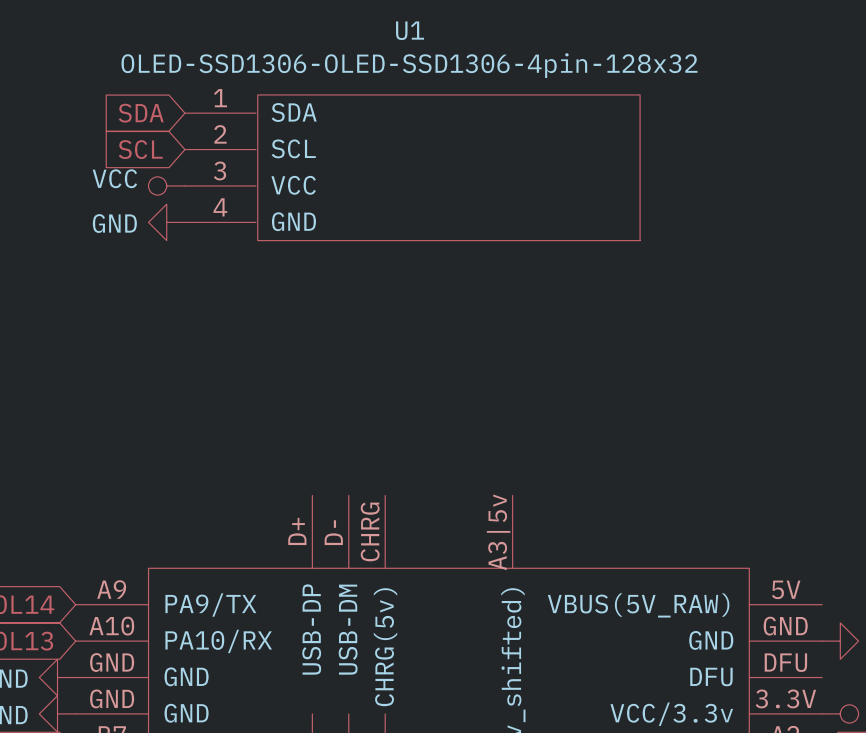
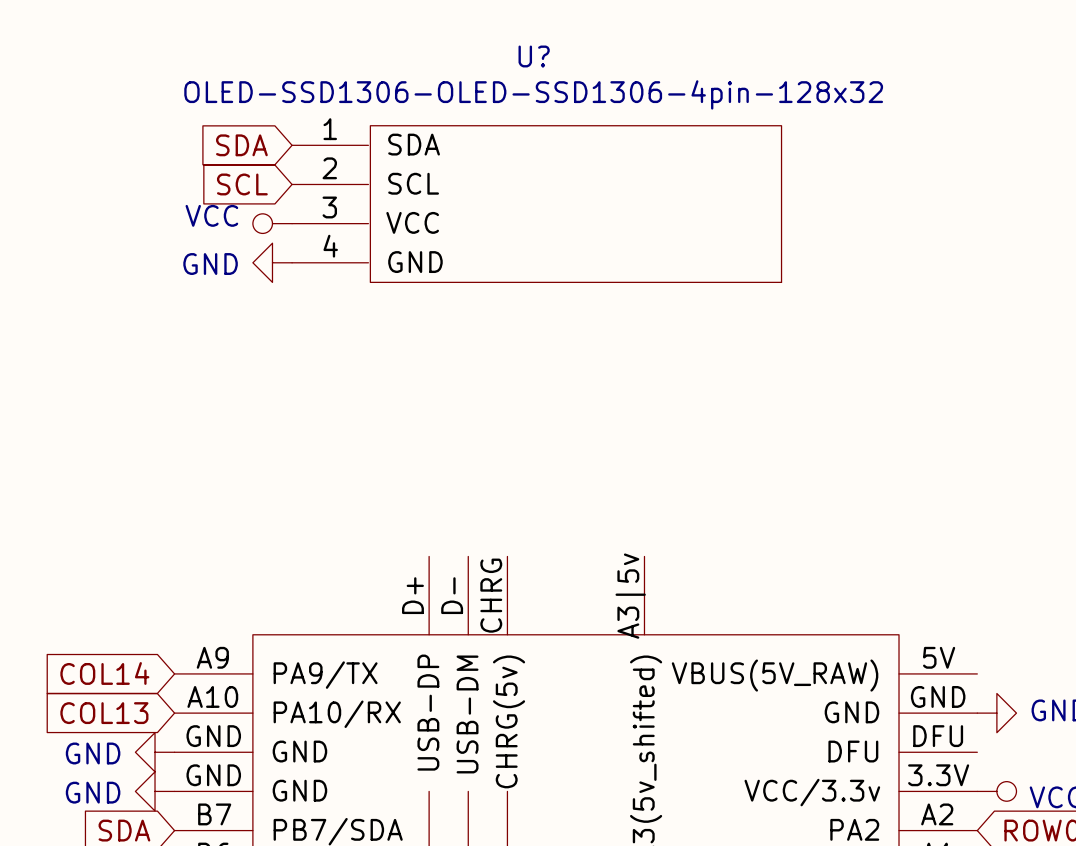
U1 name: U1 (410, 30) -> U? (534, 56)

